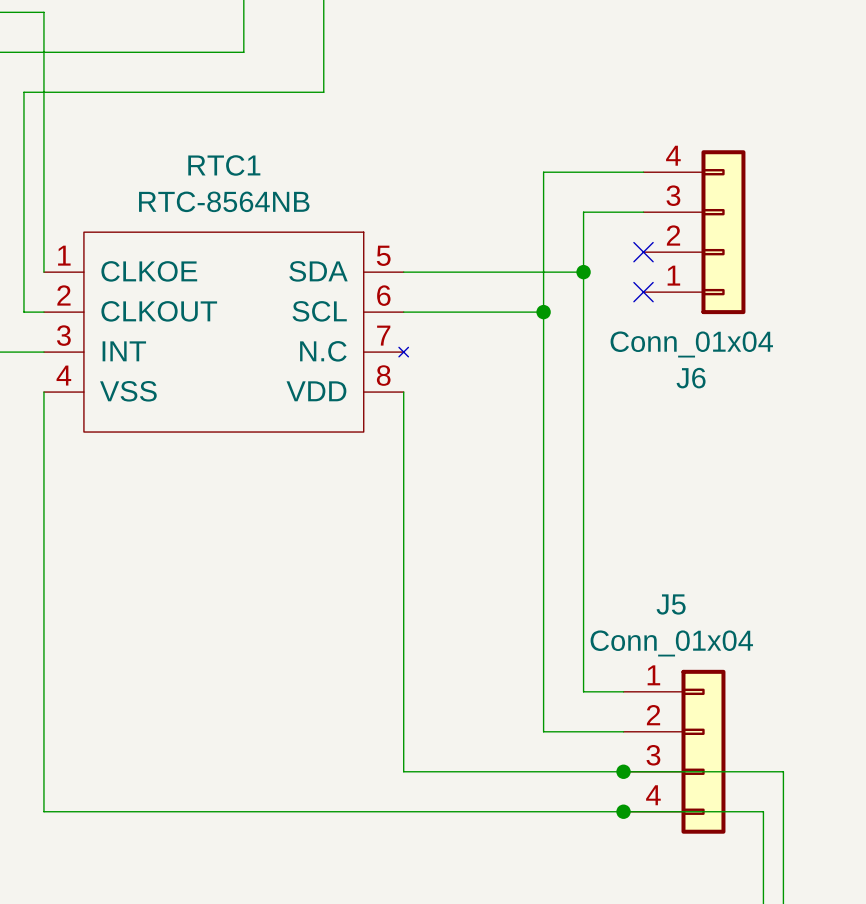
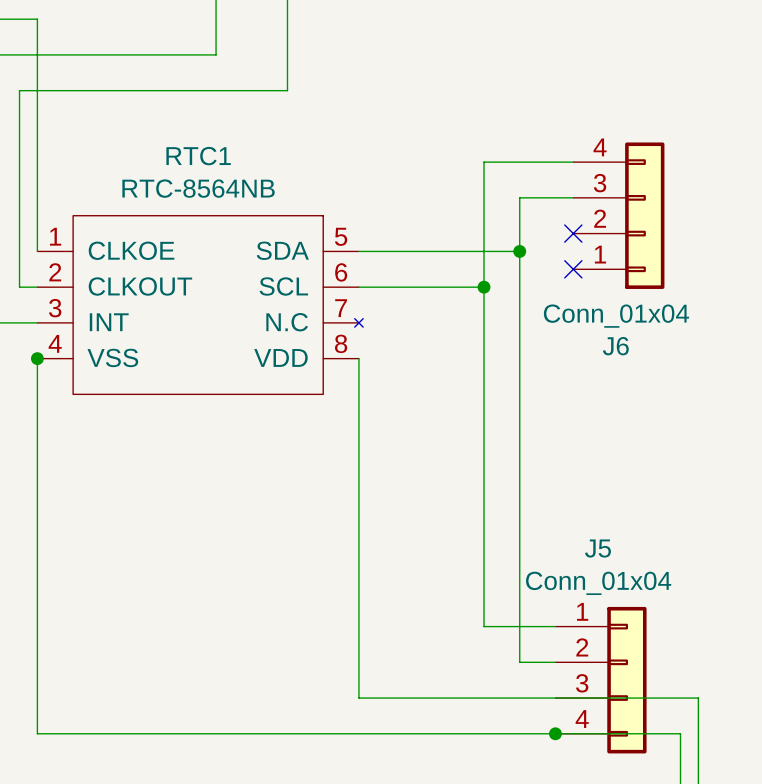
junction: none -> (37, 358)
wire: (543, 691) (543, 731) (583, 731) -> (484, 626) (519, 626) (519, 662)
junction: (623, 771) -> none

